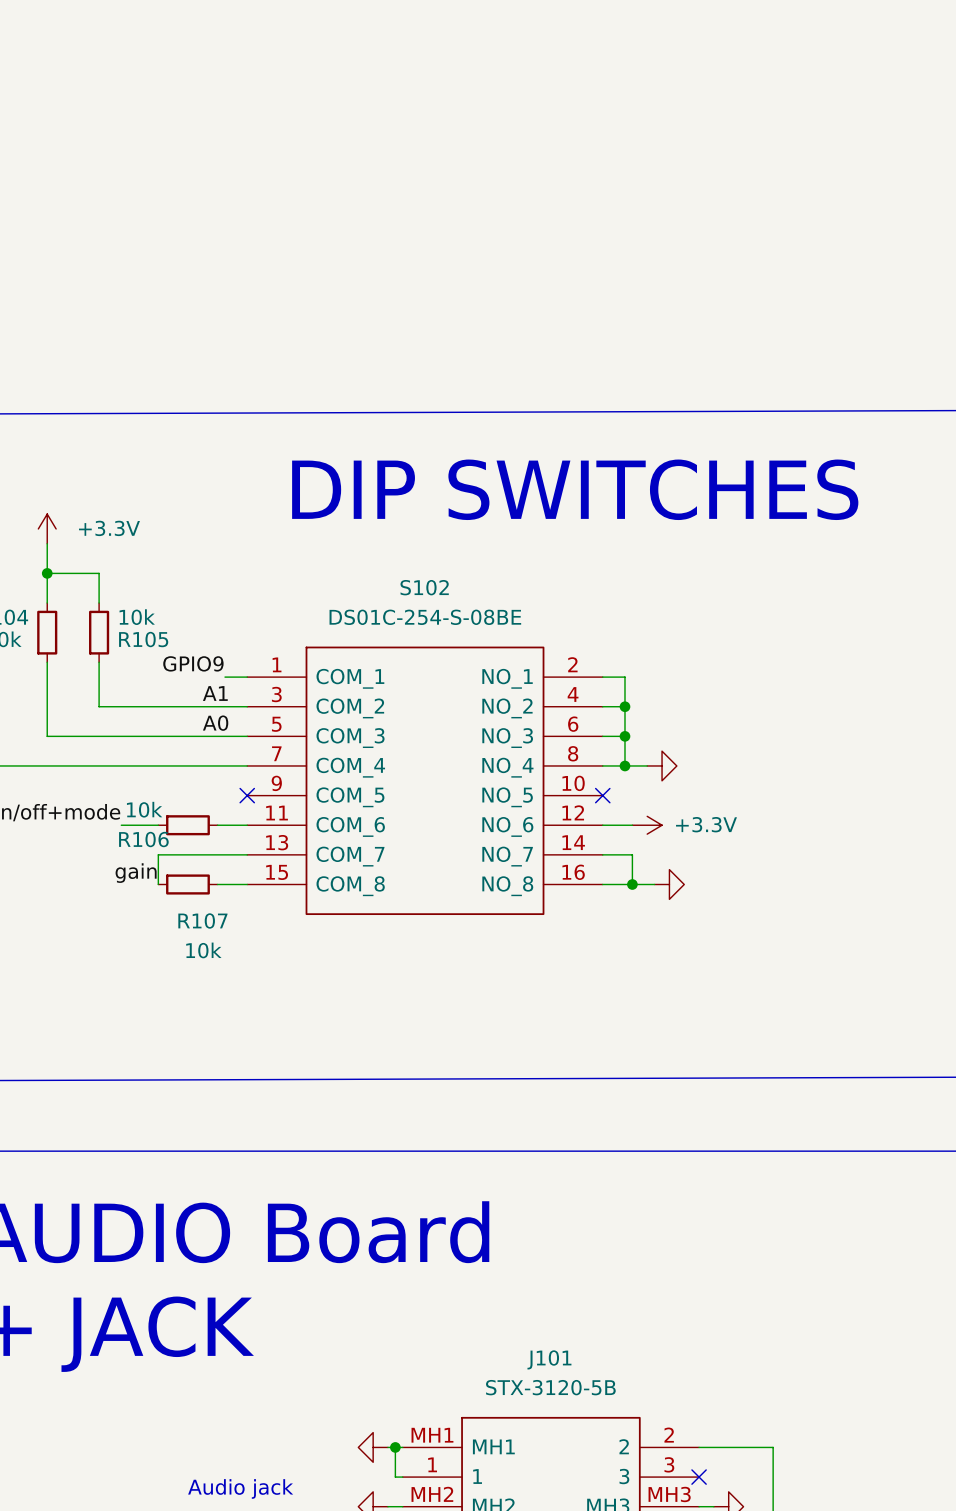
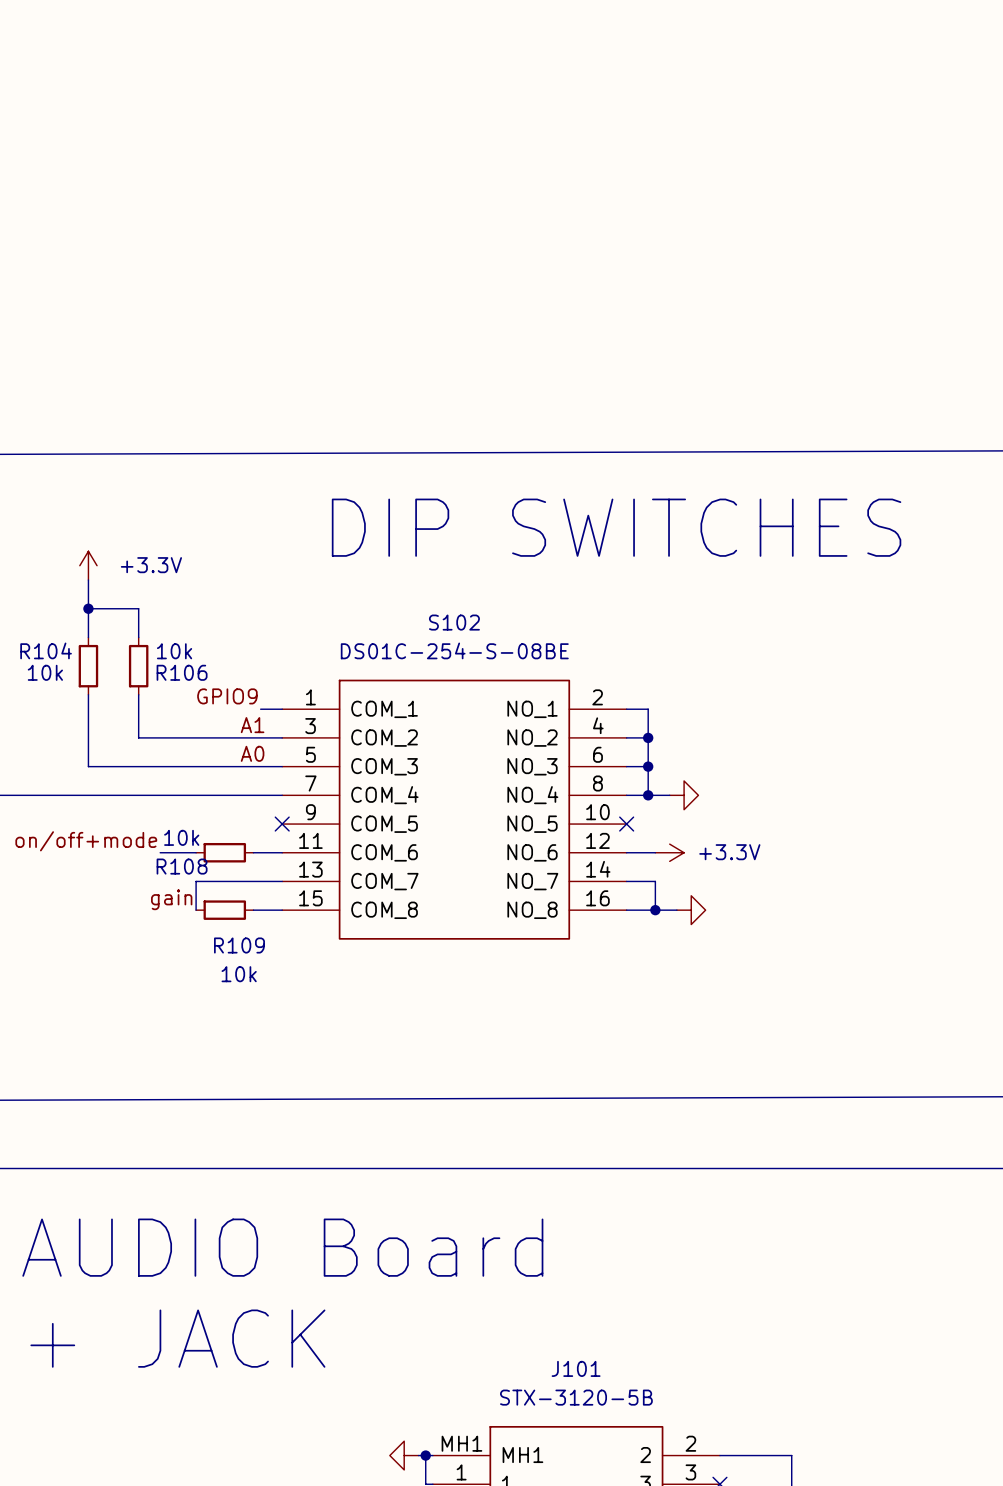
R105 name: R105 (143, 639) -> R106 (182, 672)
R106 name: R106 (143, 839) -> R108 (182, 866)
R107 name: R107 (202, 920) -> R109 (239, 945)

